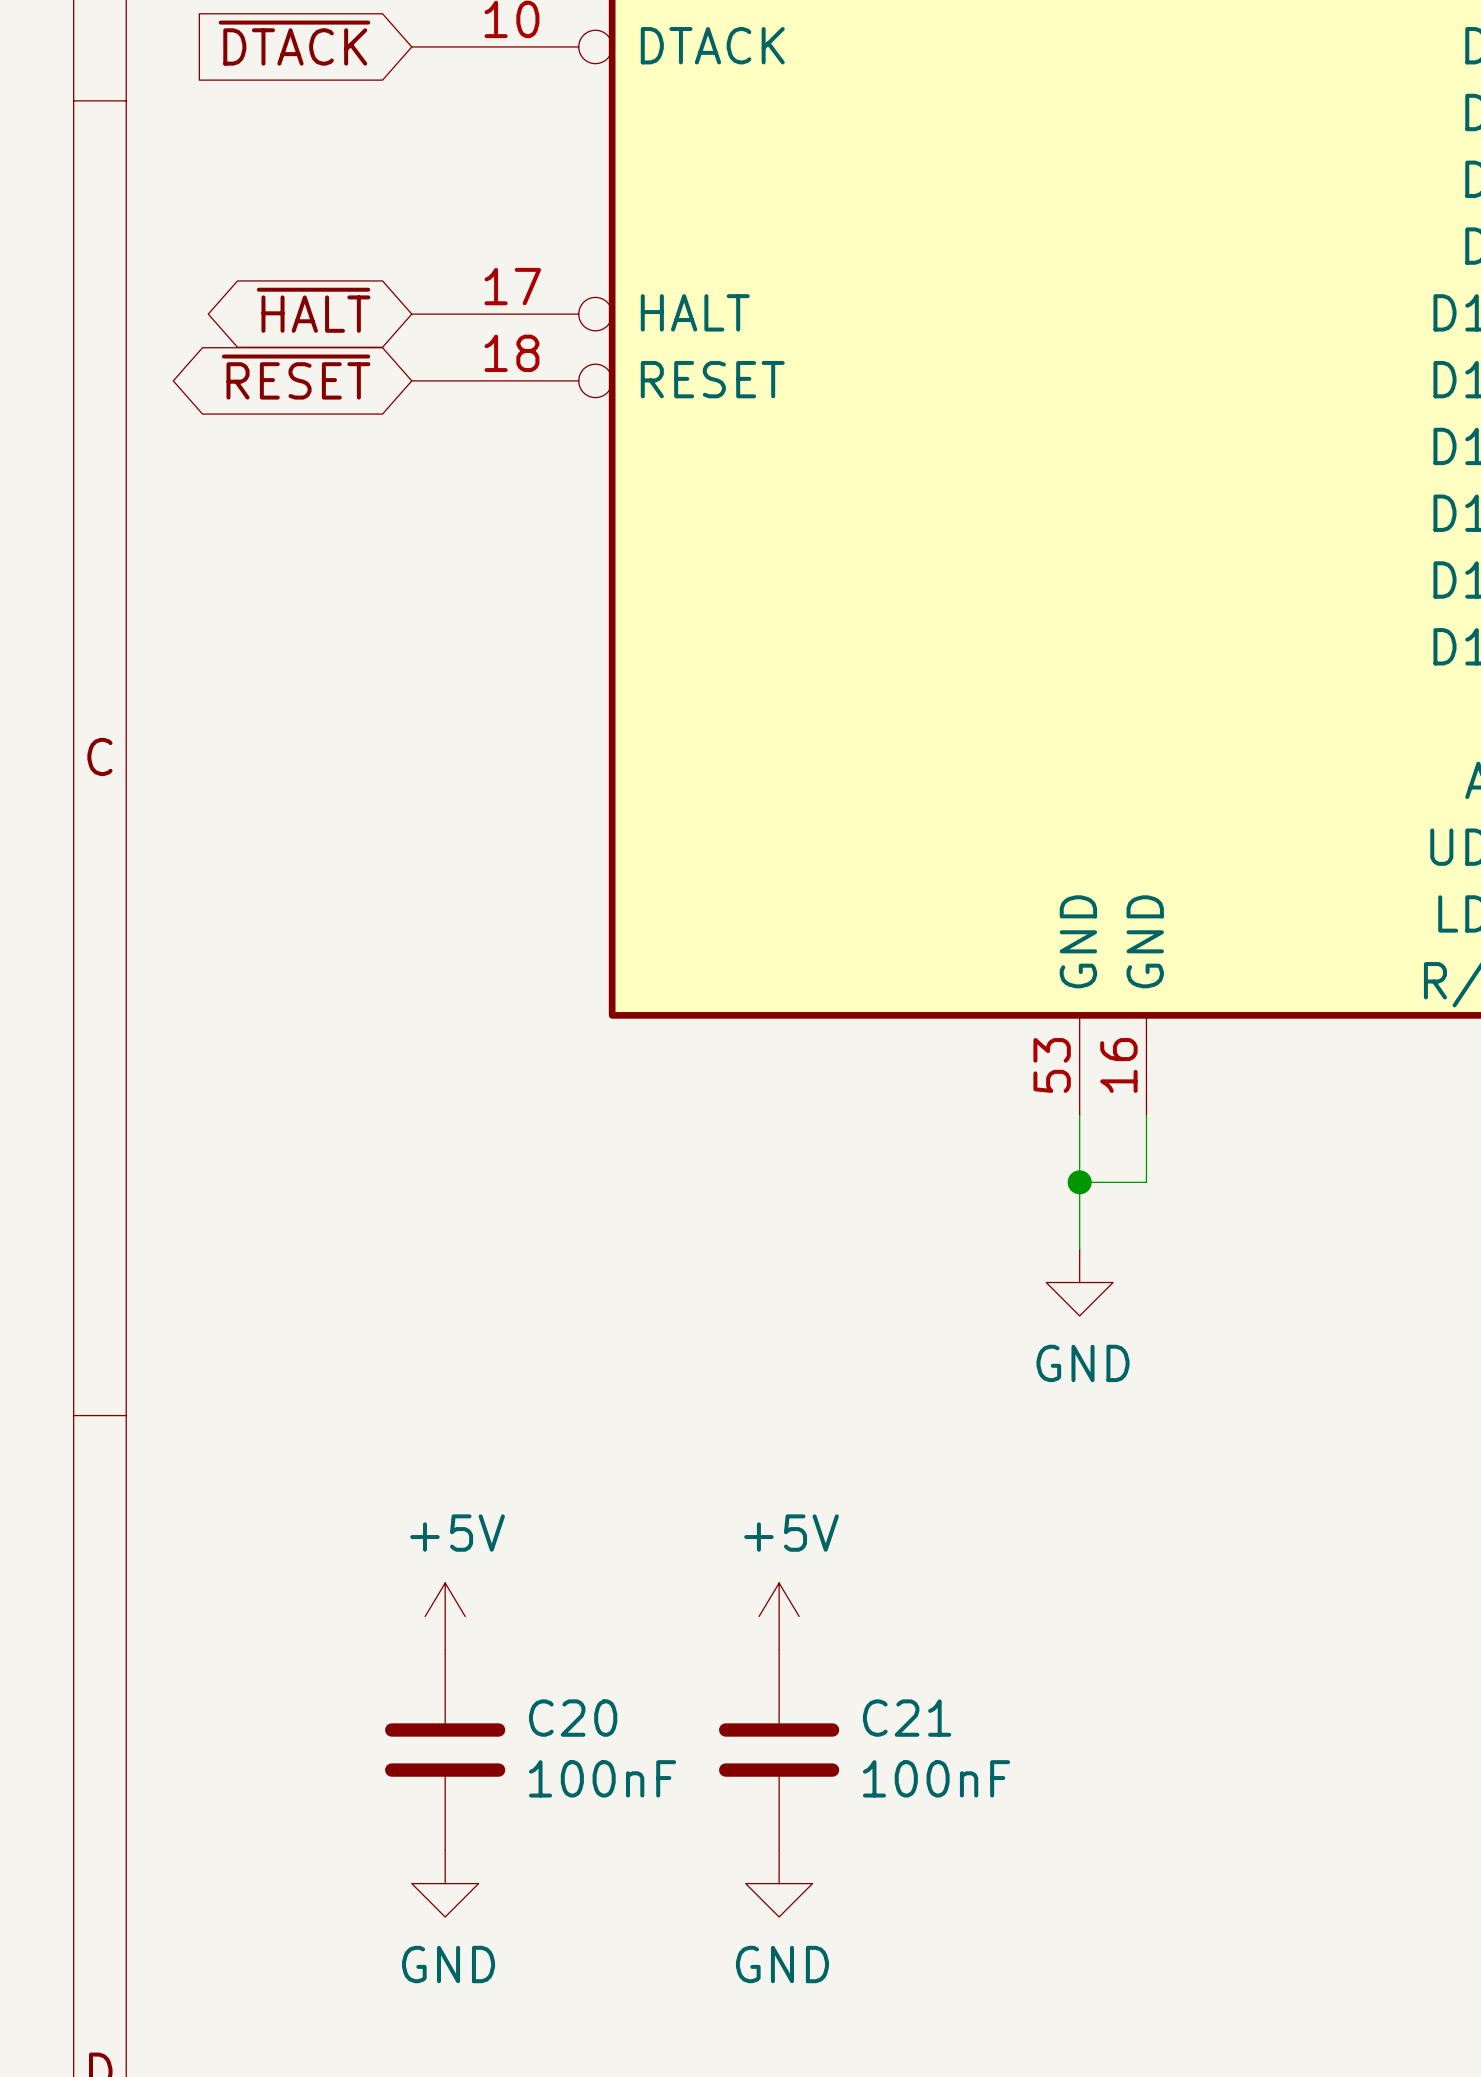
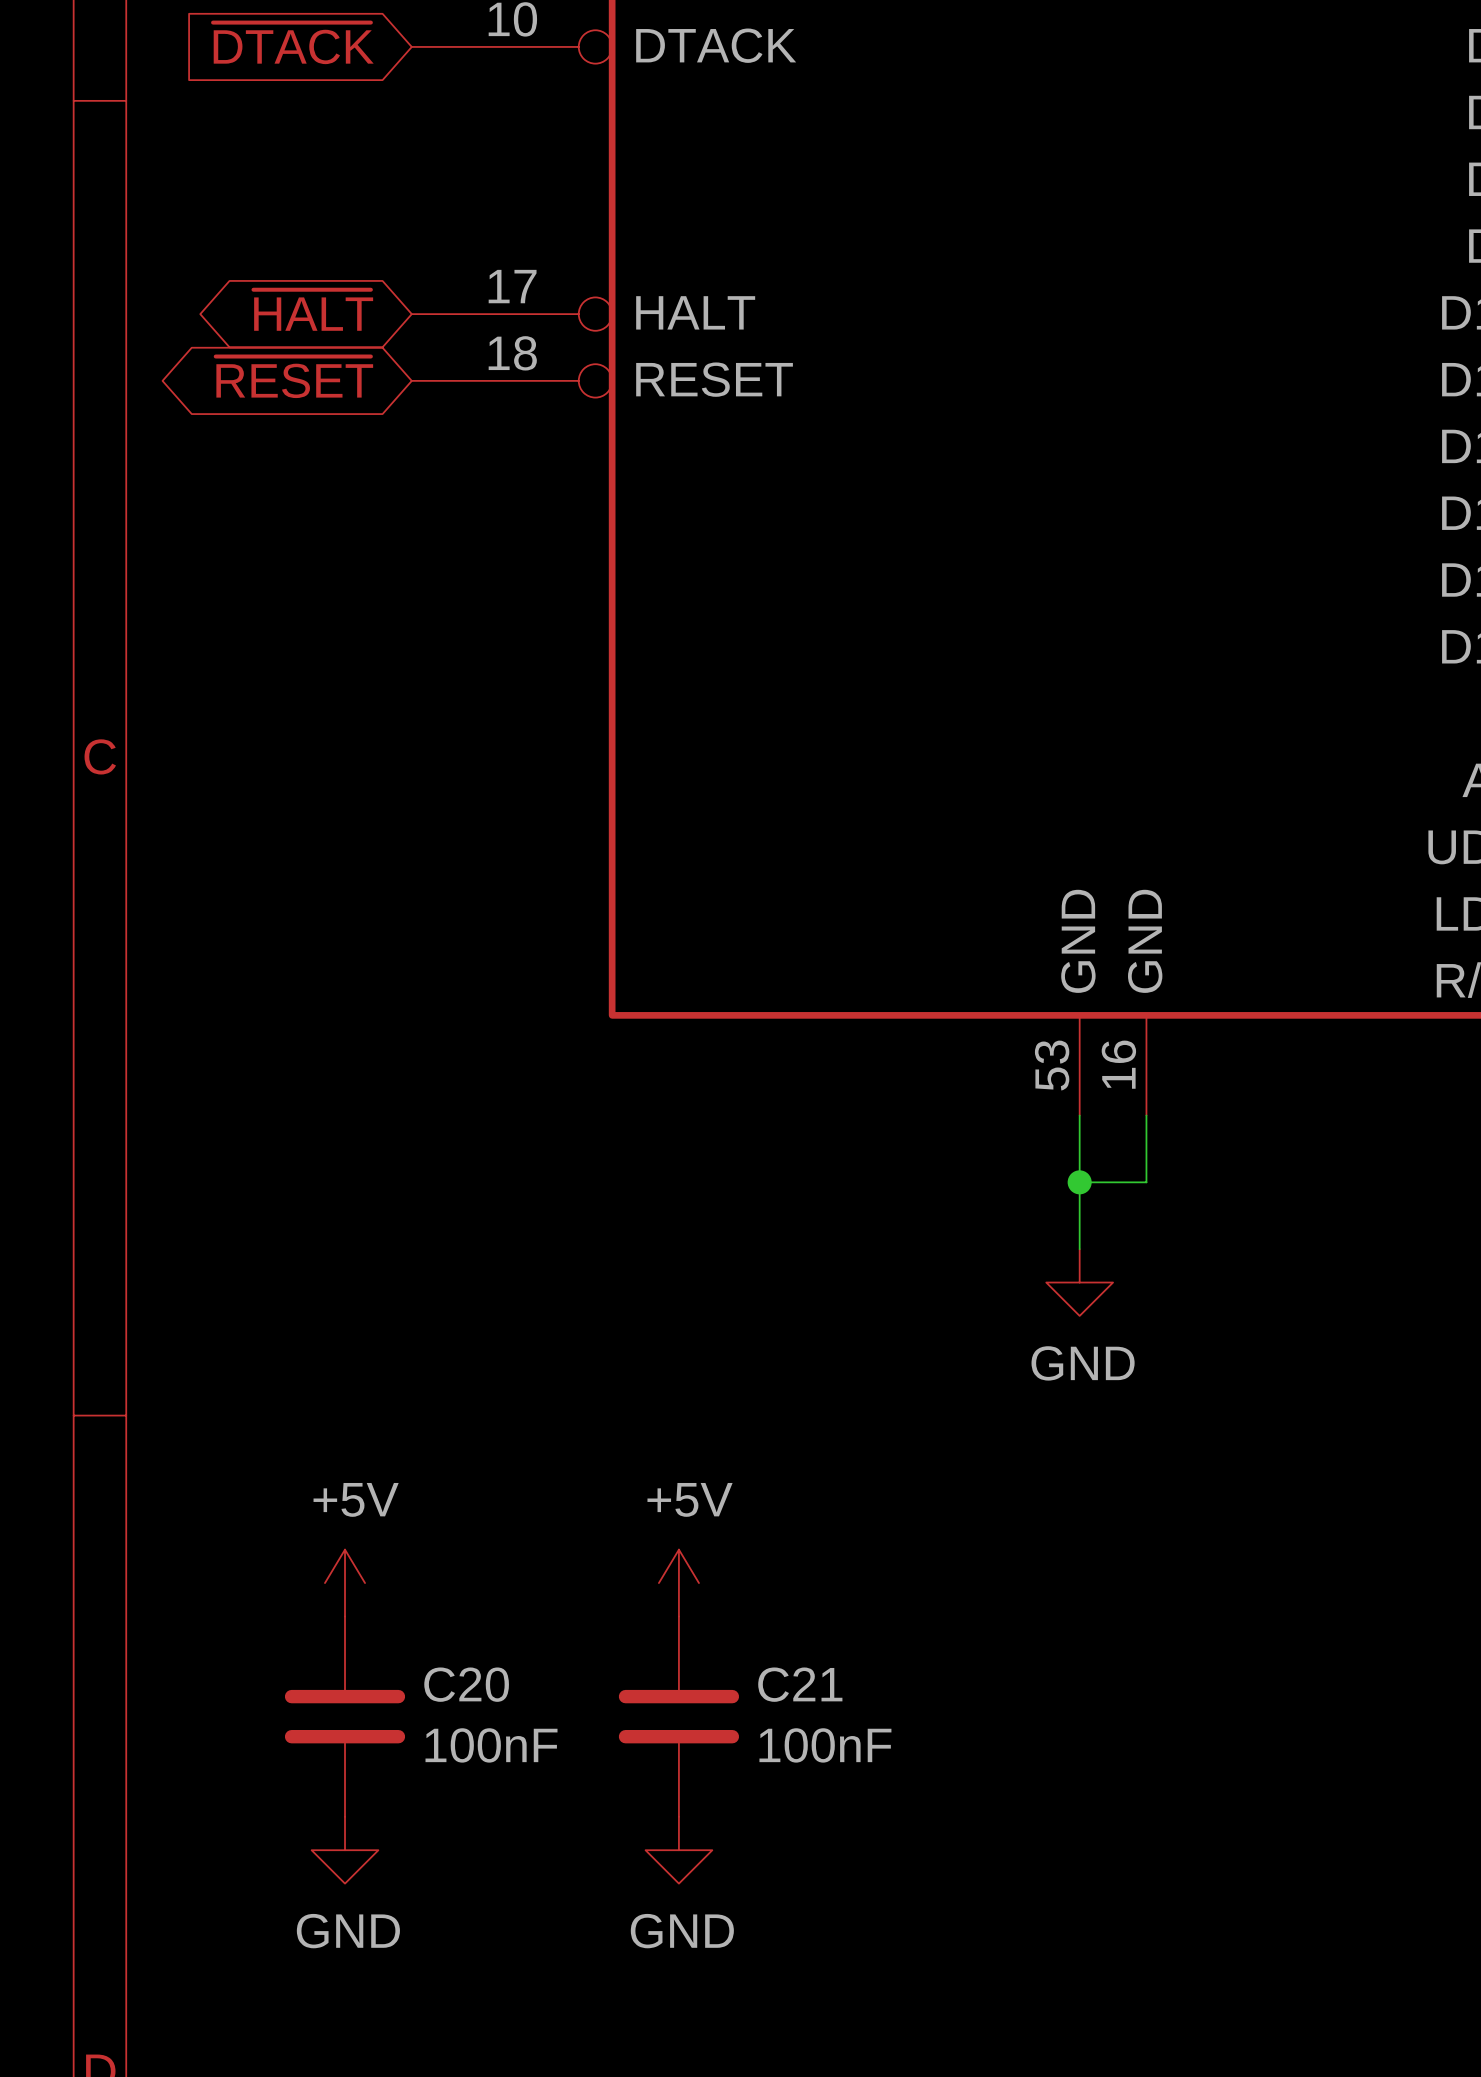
power symbol position: +5V (445, 1616) -> +5V (345, 1583)
power symbol position: +5V (779, 1616) -> +5V (678, 1583)
C20 position: (445, 1750) -> (345, 1716)
C21 position: (779, 1750) -> (678, 1716)
power symbol position: GND (445, 1883) -> GND (345, 1850)
power symbol position: GND (779, 1883) -> GND (678, 1850)

